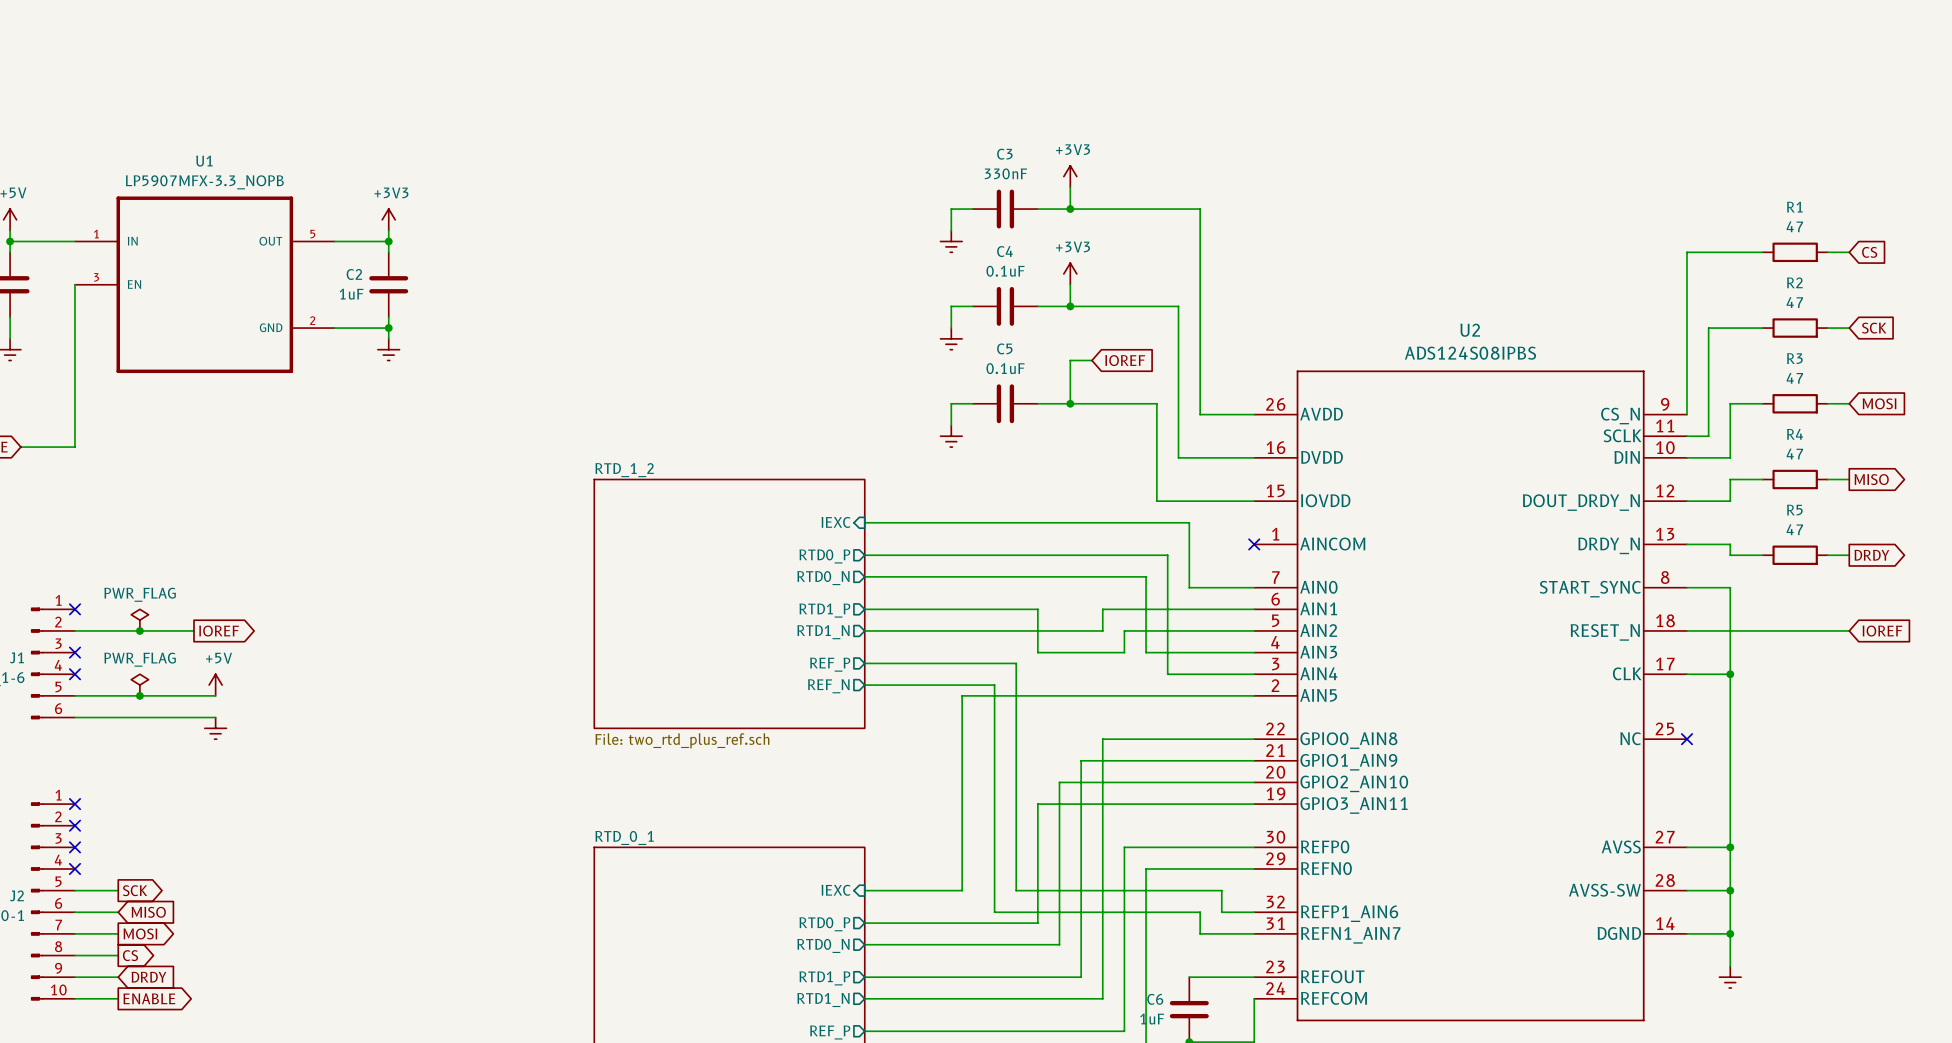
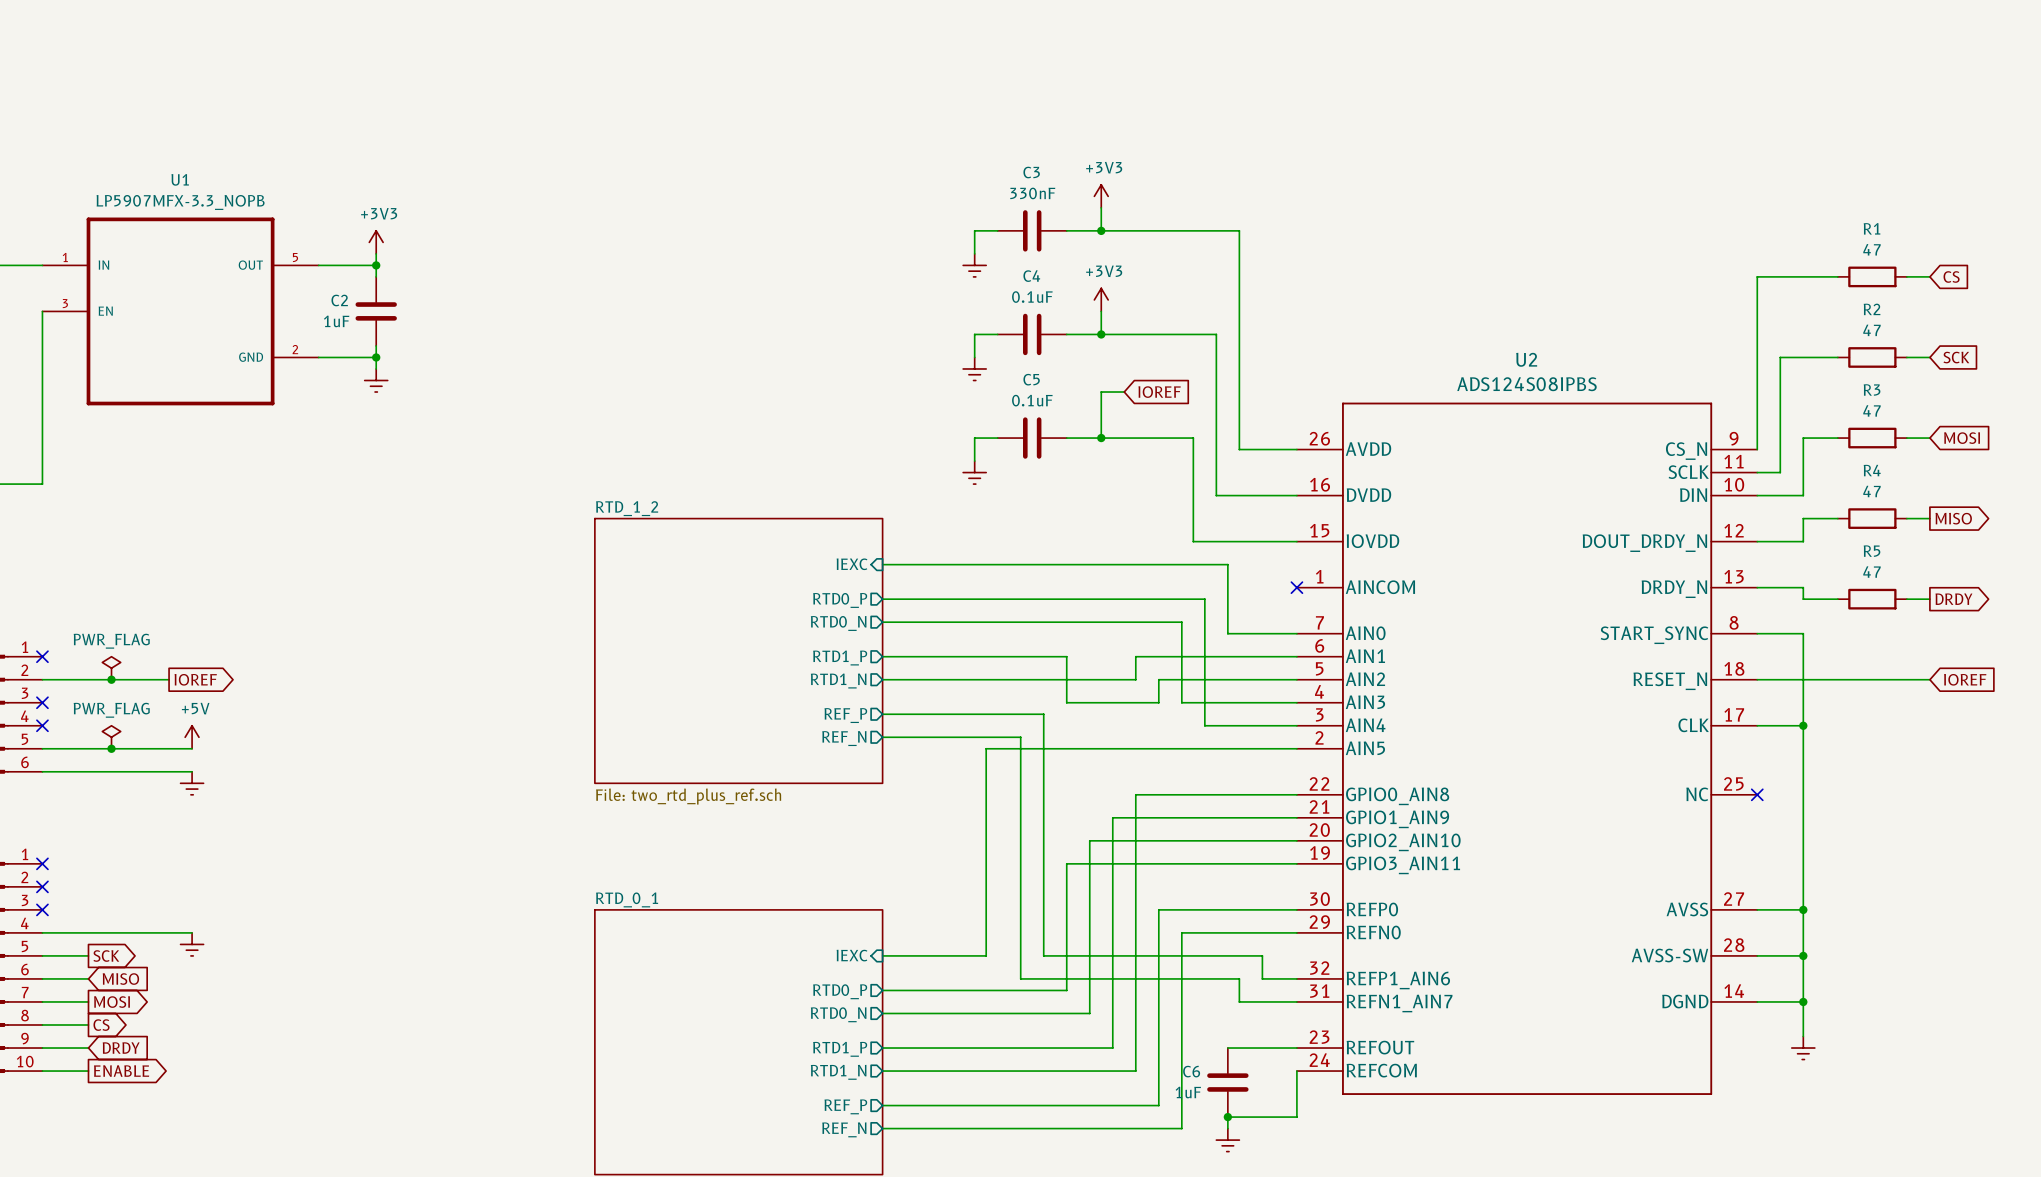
wire: none -> (42, 932) (192, 932)
no-connect mark: (74, 868) -> none
power symbol: none -> (192, 944)

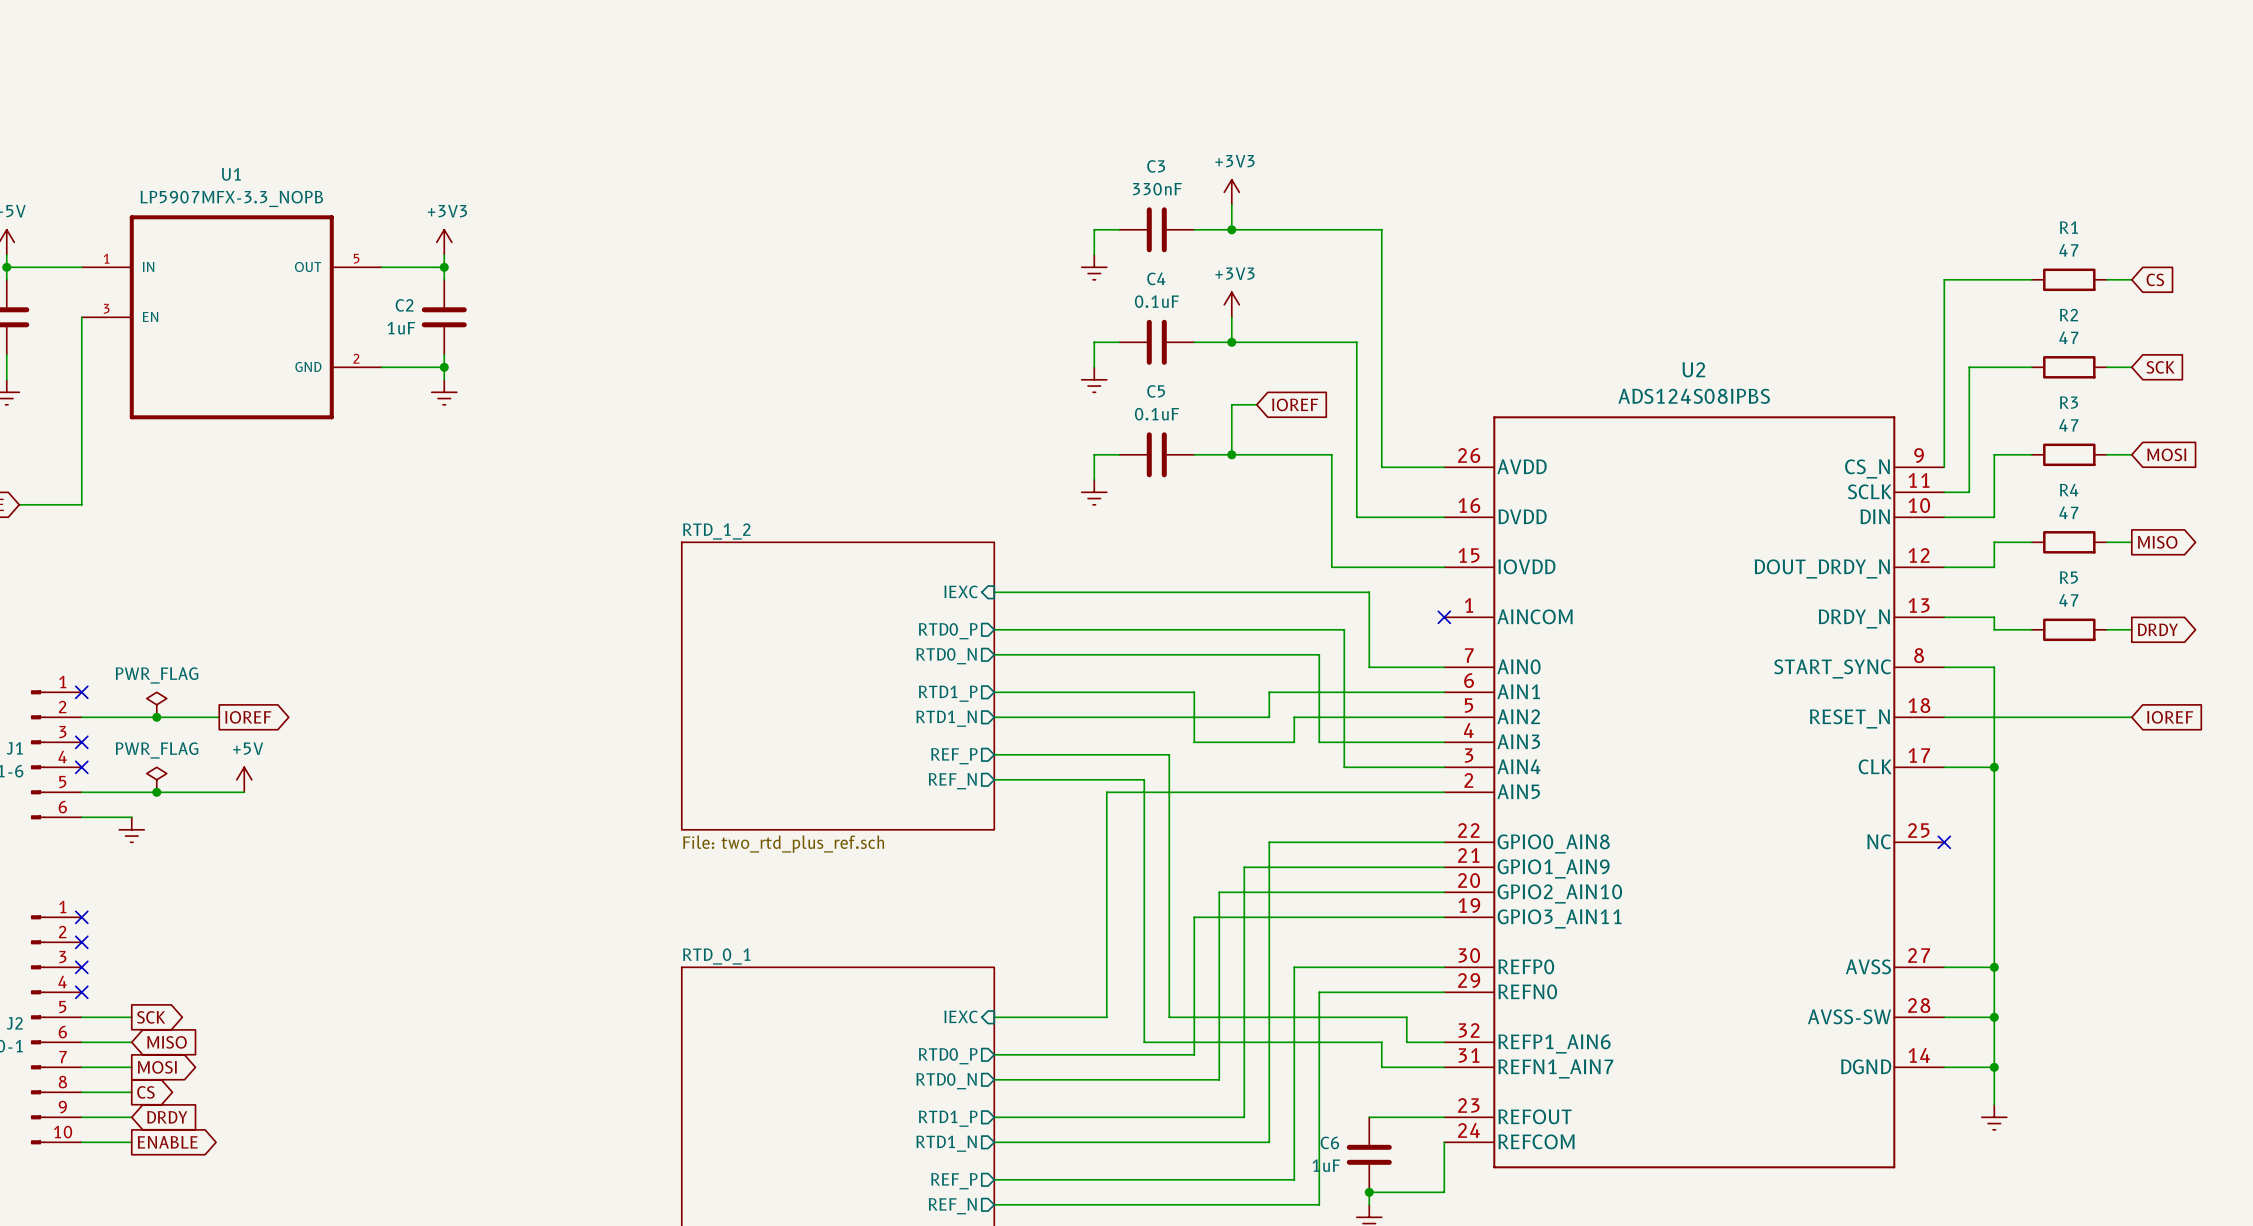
wire: (88, 771) (192, 771) -> none
power symbol: none -> (131, 829)
power symbol: (192, 783) -> none
wire: (42, 932) (192, 932) -> none
no-connect mark: none -> (81, 992)
power symbol: (192, 944) -> none

